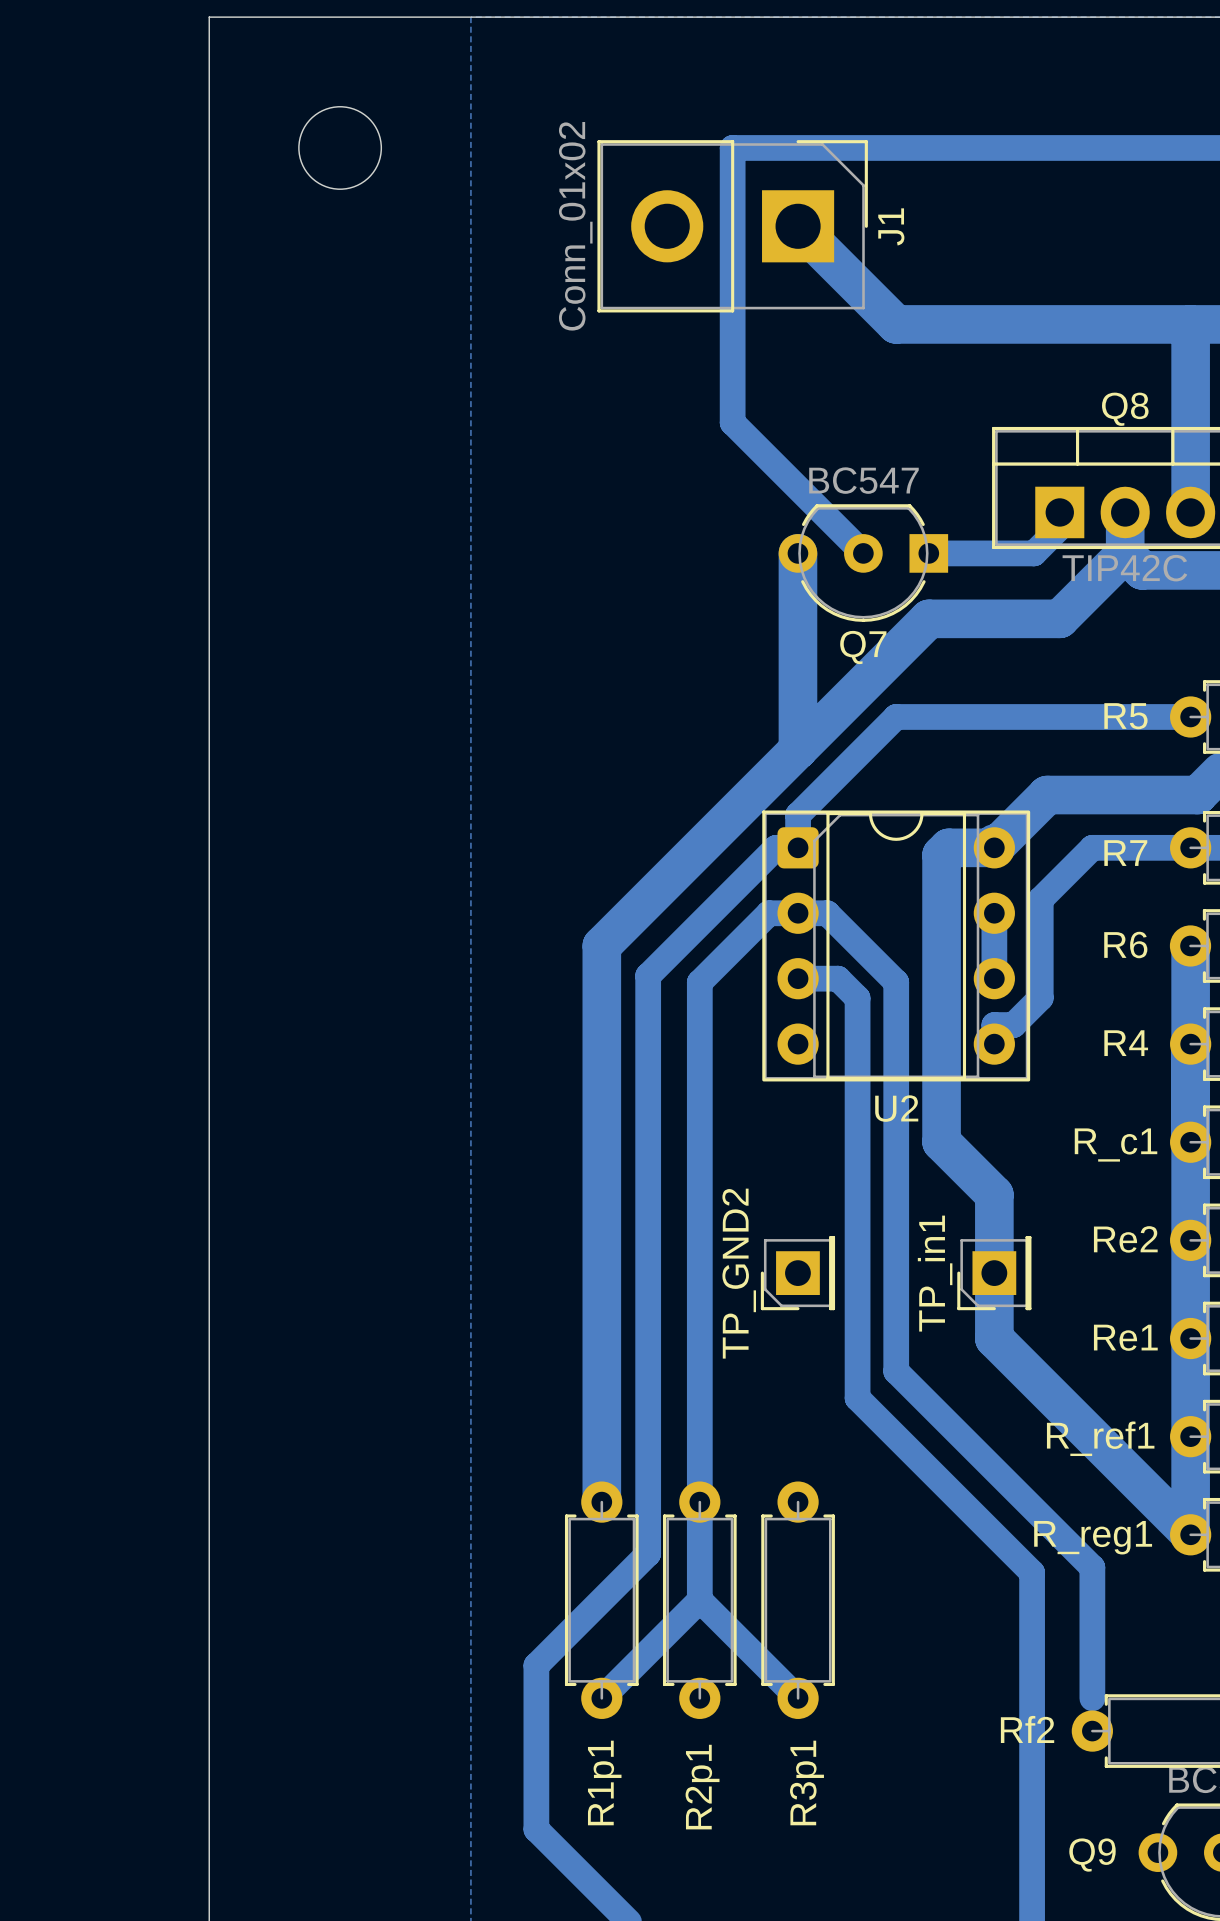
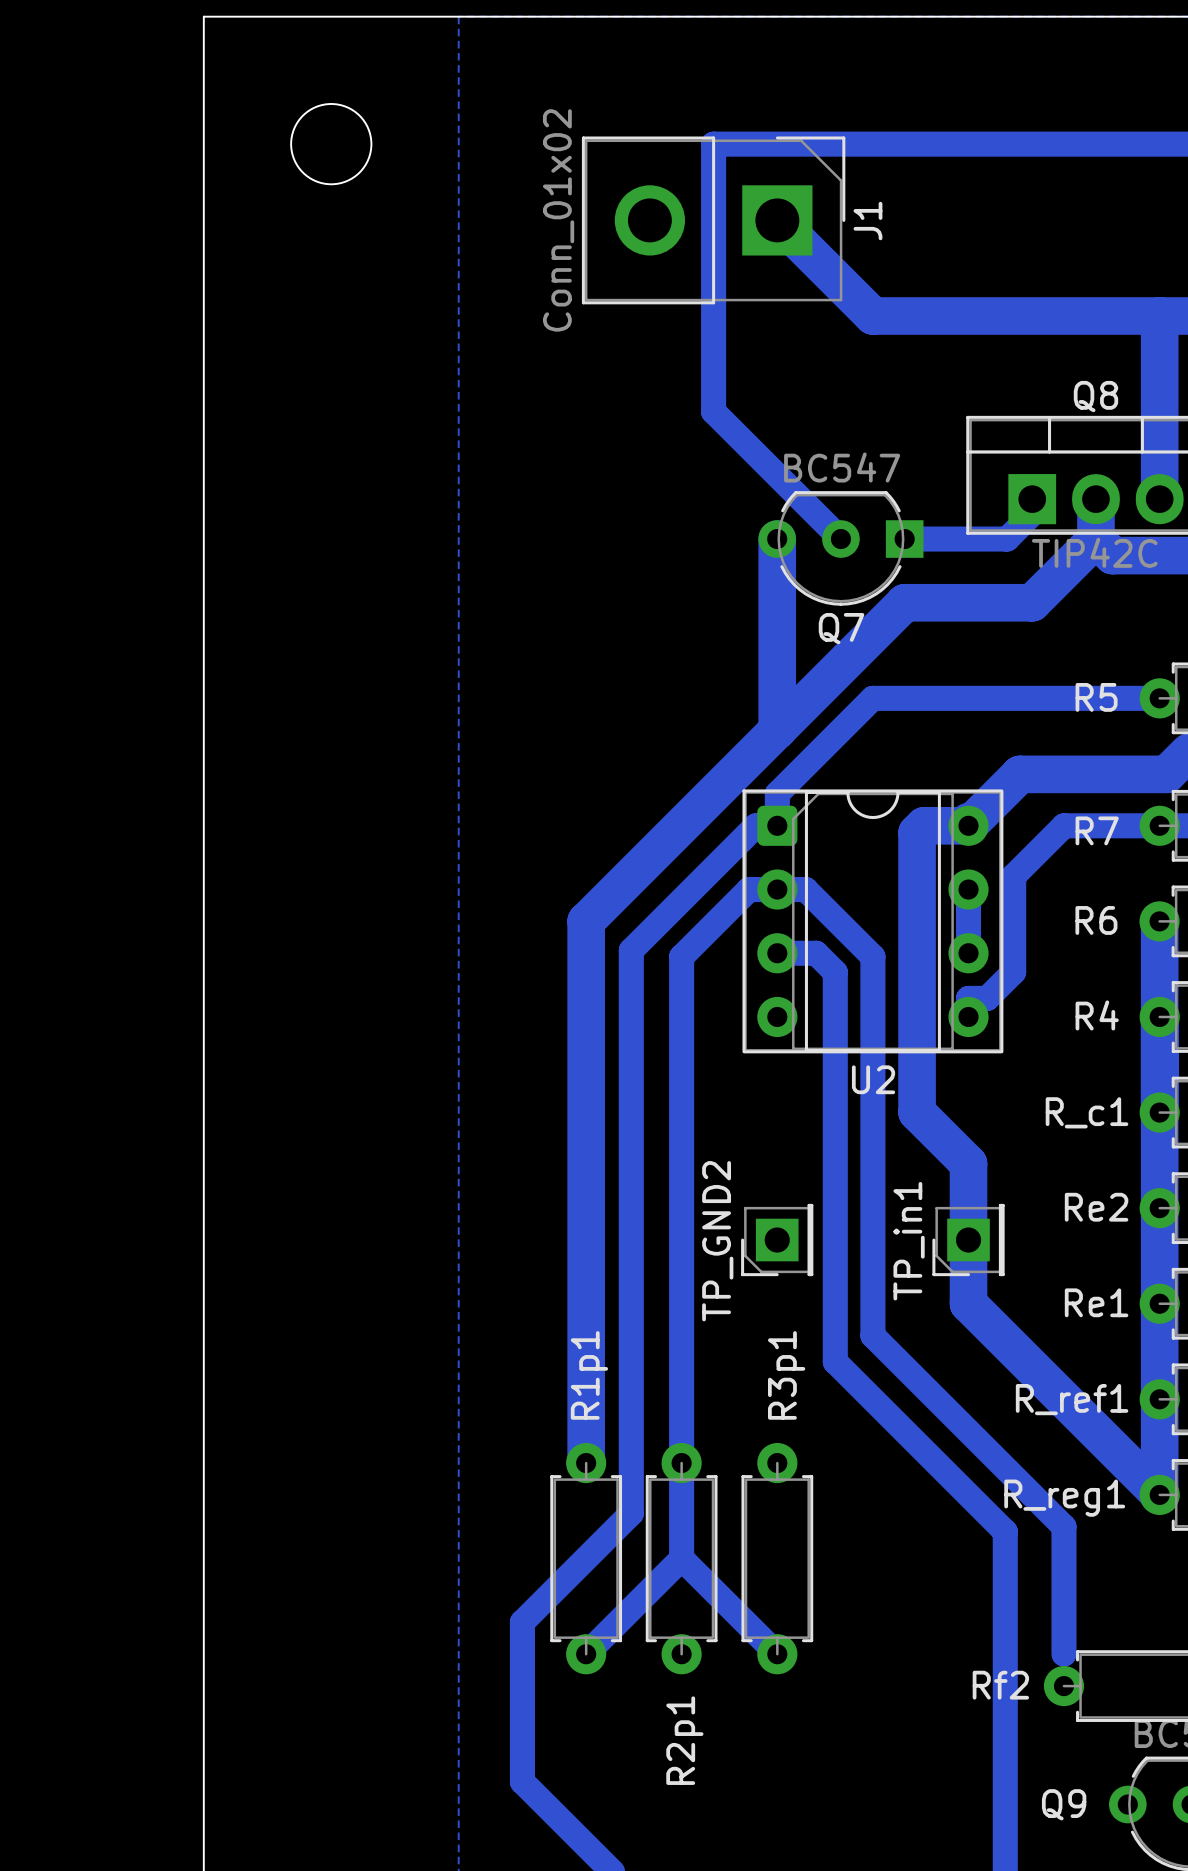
R1p1 name position: R1p1 (604, 1782) -> R1p1 (589, 1375)
R3p1 name position: R3p1 (806, 1782) -> R3p1 (786, 1375)

